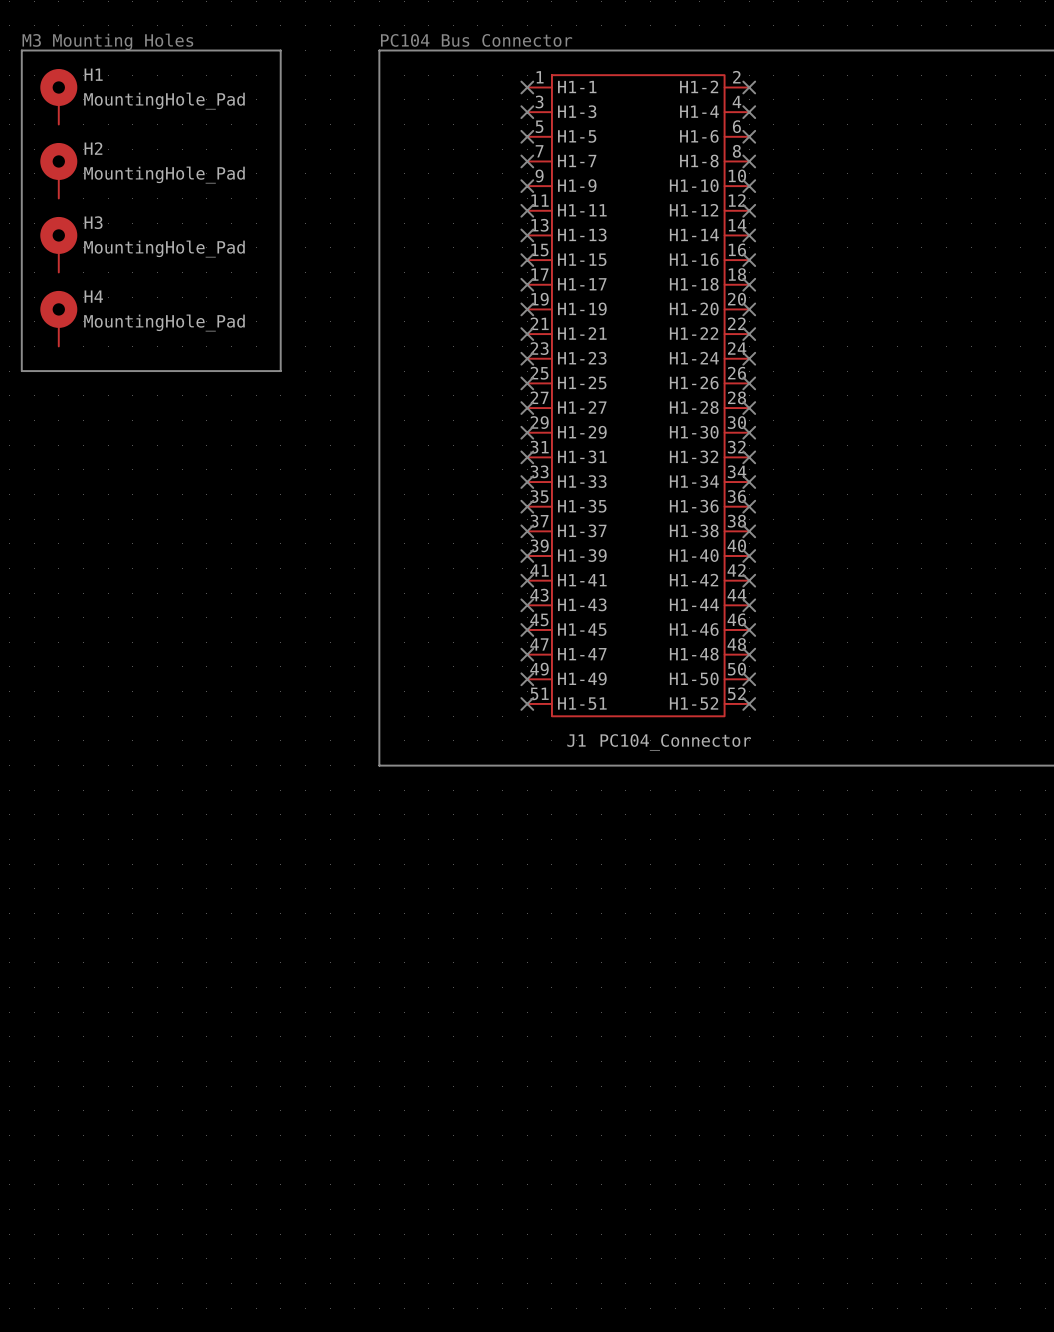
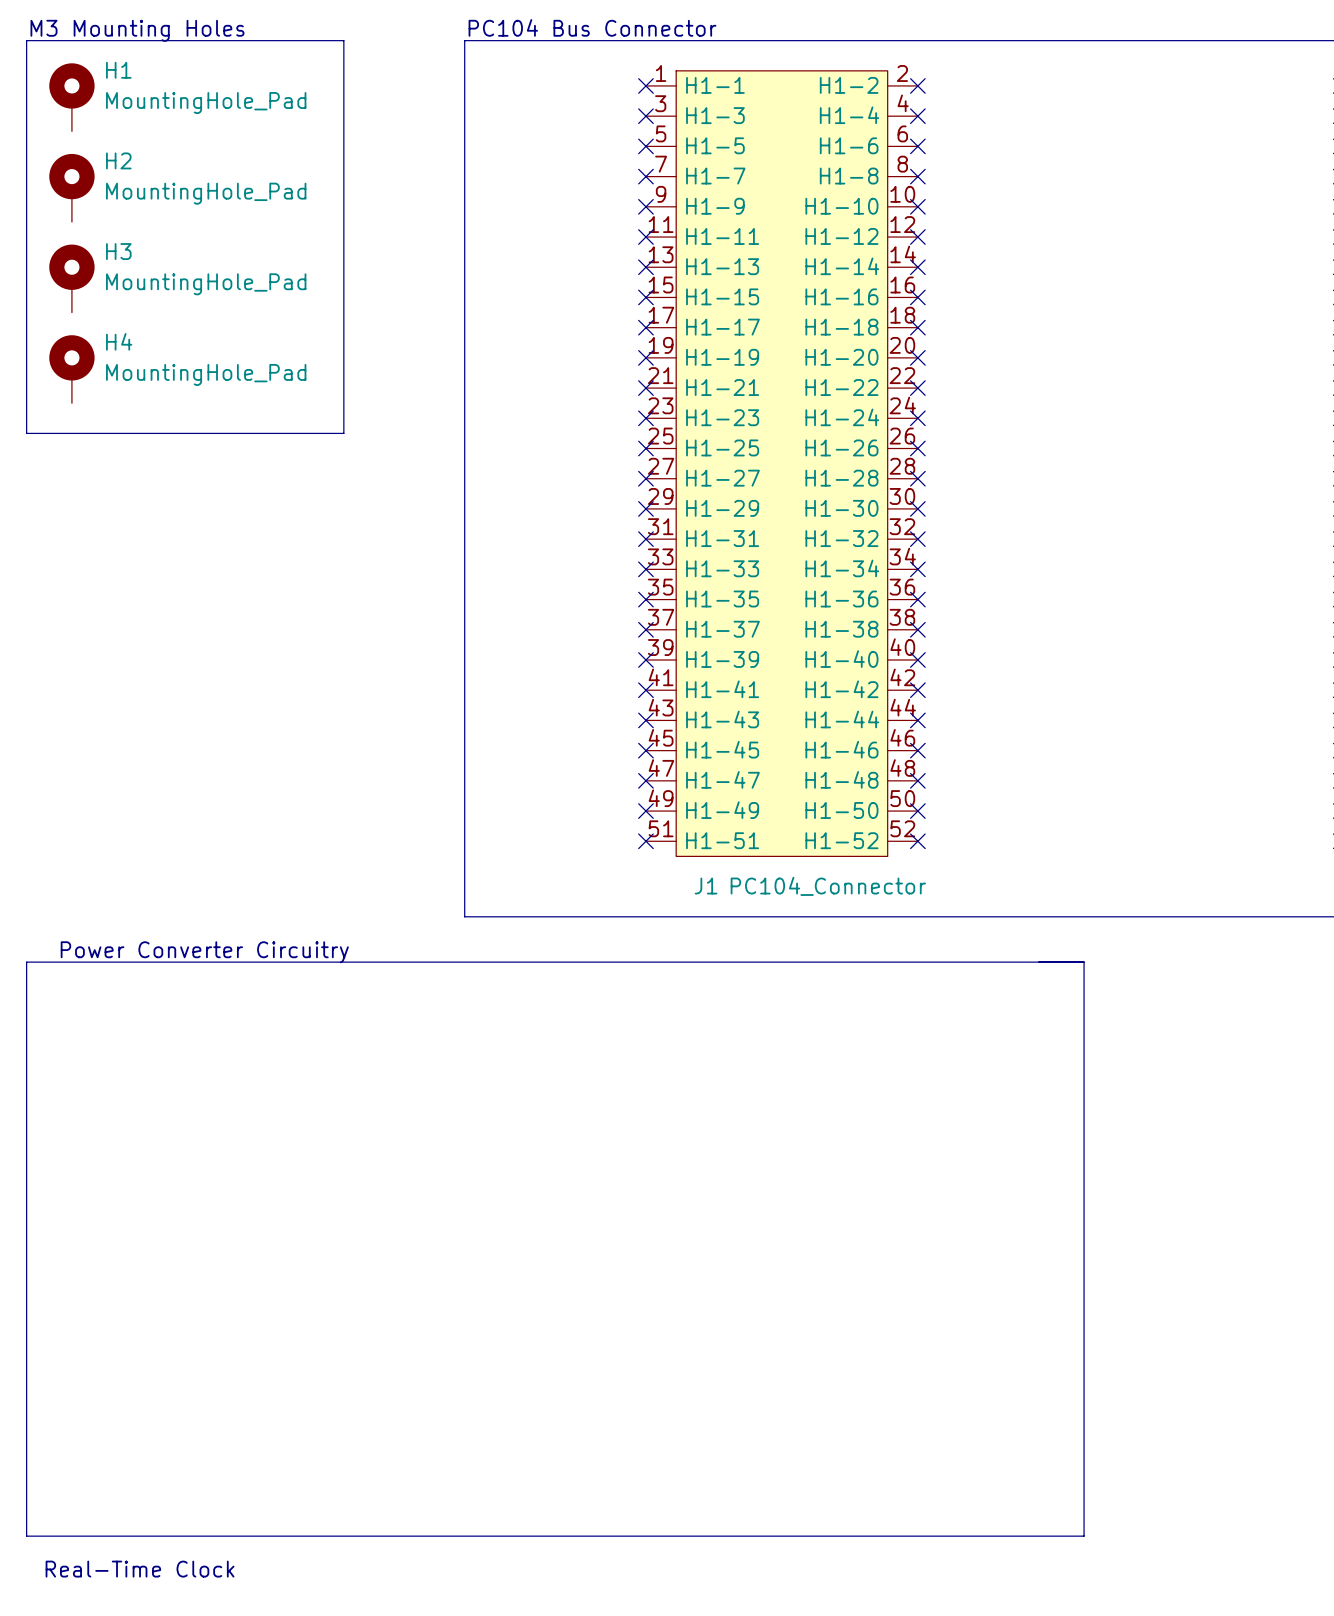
text: none -> Power Converter Circuitry (204, 952)
line: none -> (26, 962) (26, 1536) (1084, 1536) (1084, 962) (26, 962)
text: none -> Real-Time Clock (140, 1569)

